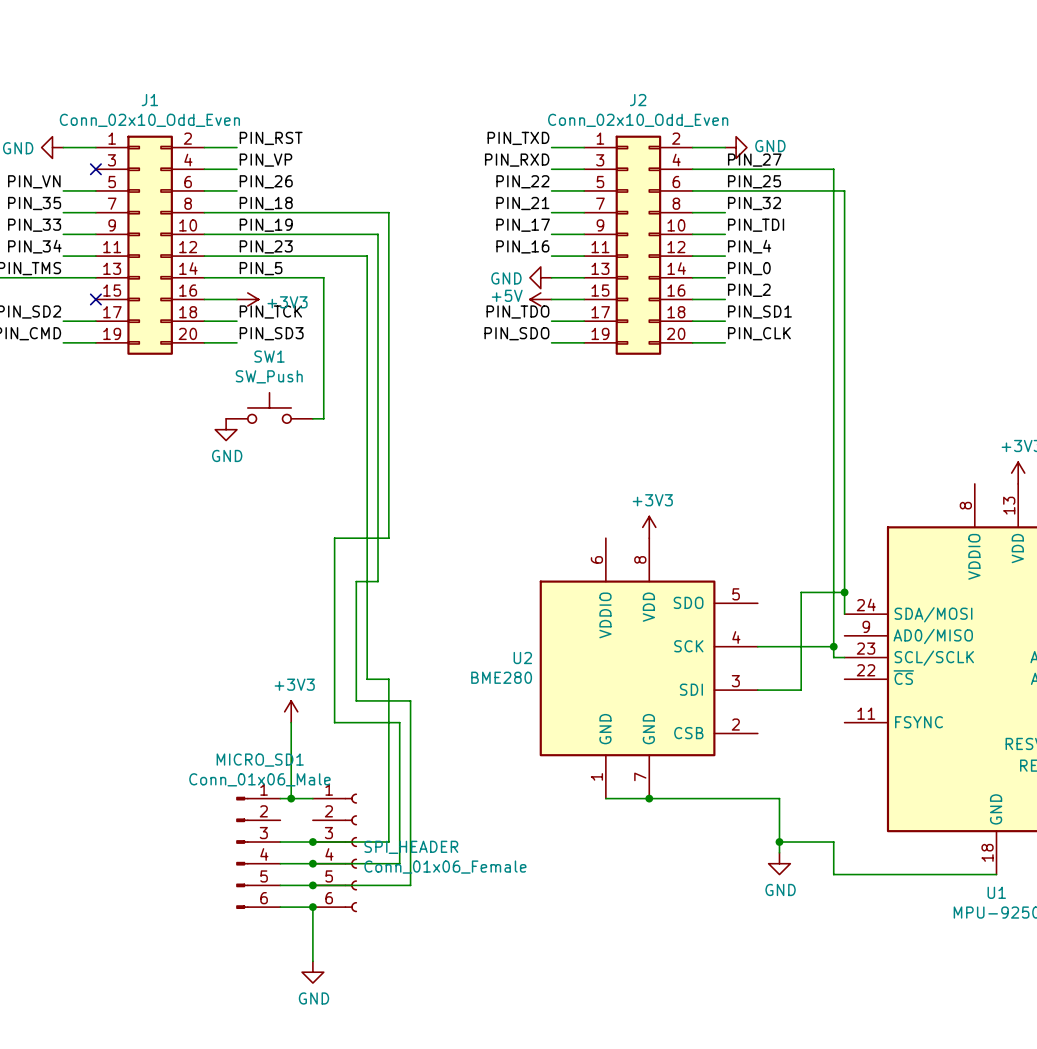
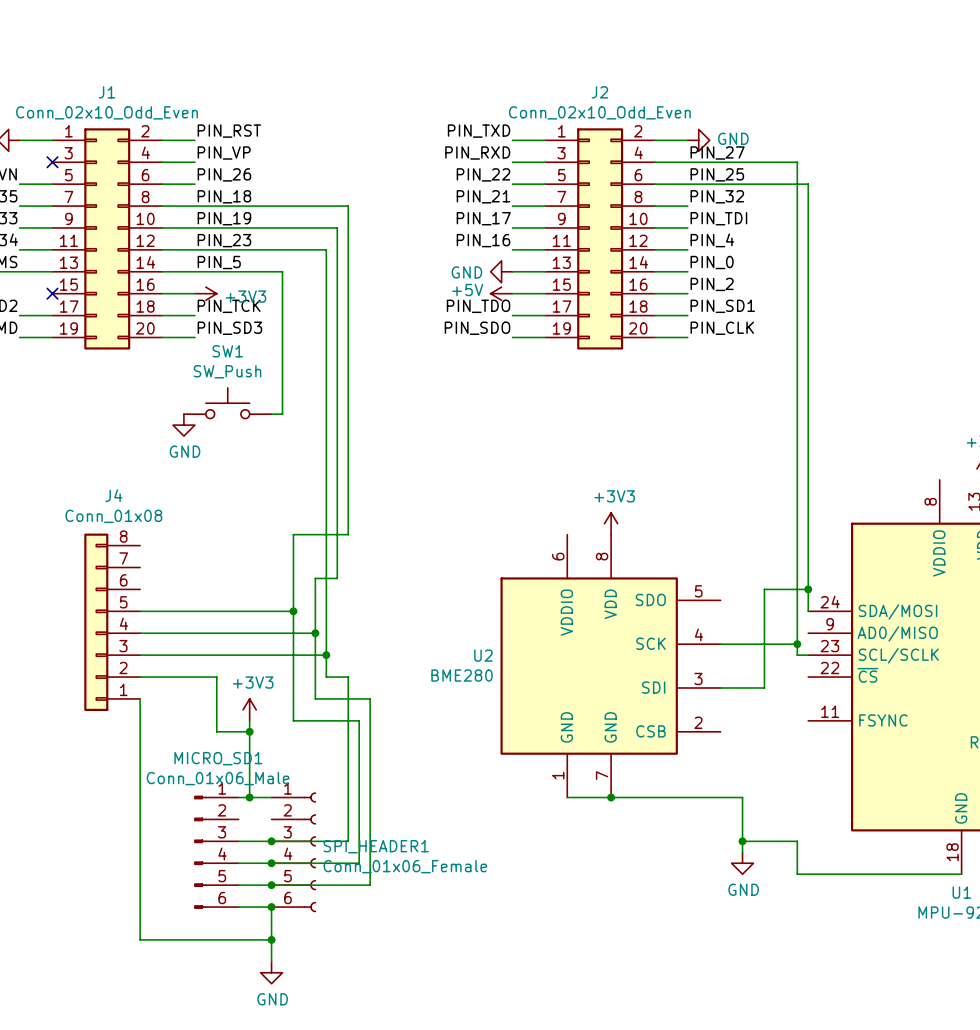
wire: none -> (140, 611) (293, 611)
junction: none -> (293, 611)
J4: none -> Conn_01x08 (112, 622)
wire: none -> (140, 633) (315, 633)
junction: none -> (315, 633)
wire: none -> (140, 655) (326, 655)
junction: none -> (326, 655)
wire: none -> (140, 677) (216, 677) (216, 731) (249, 731)
wire: none -> (140, 698) (140, 939) (271, 939)
junction: none -> (249, 731)
SPI_HEADER name: SPI_HEADER (411, 847) -> SPI_HEADER1 (376, 846)
junction: none -> (271, 939)

